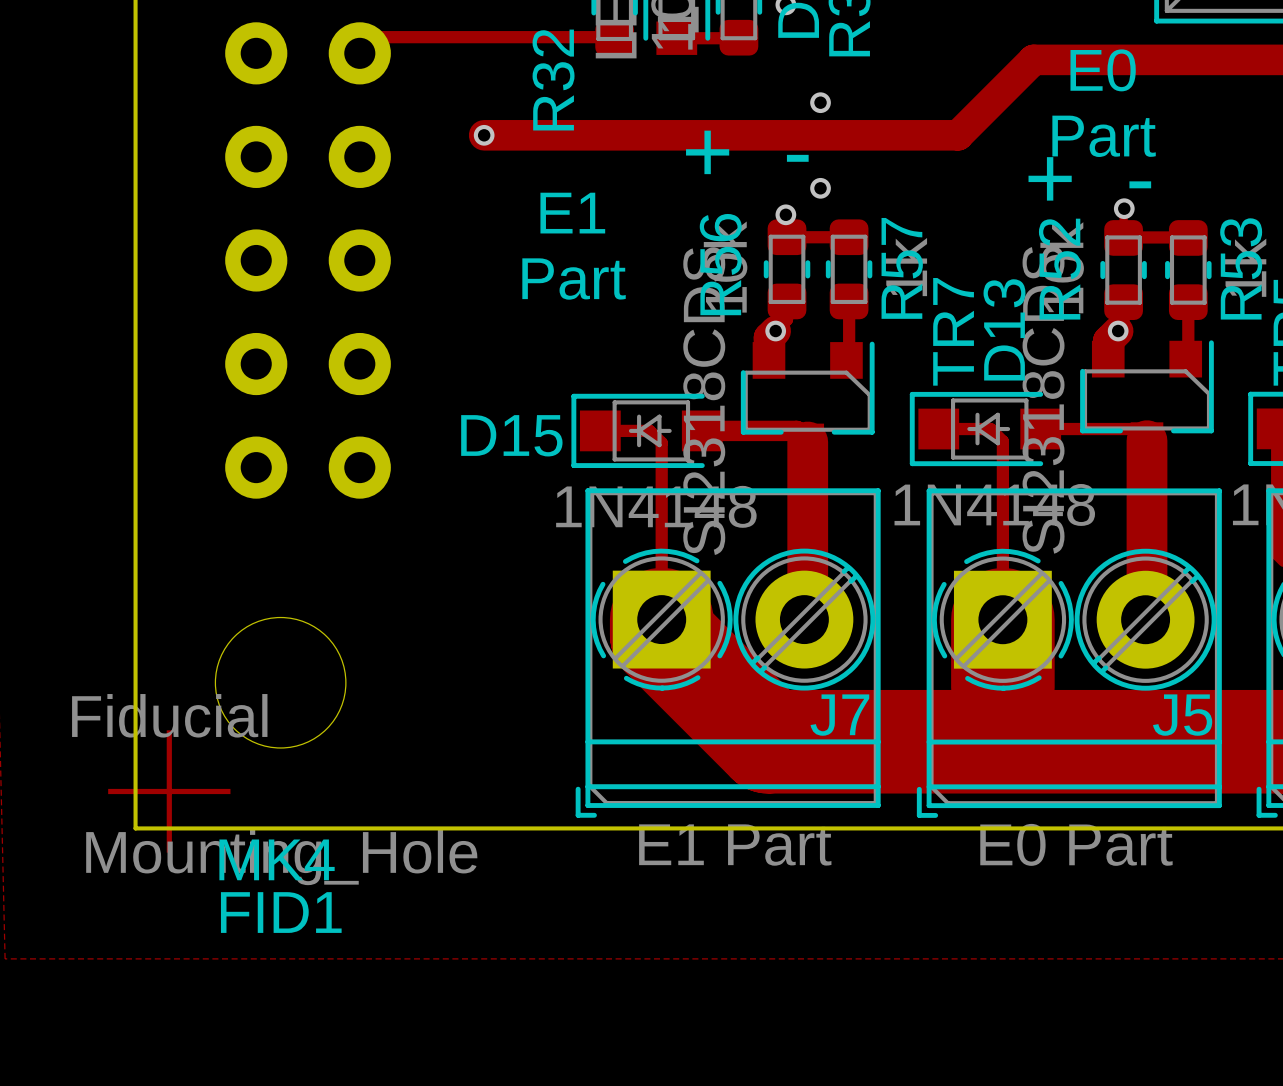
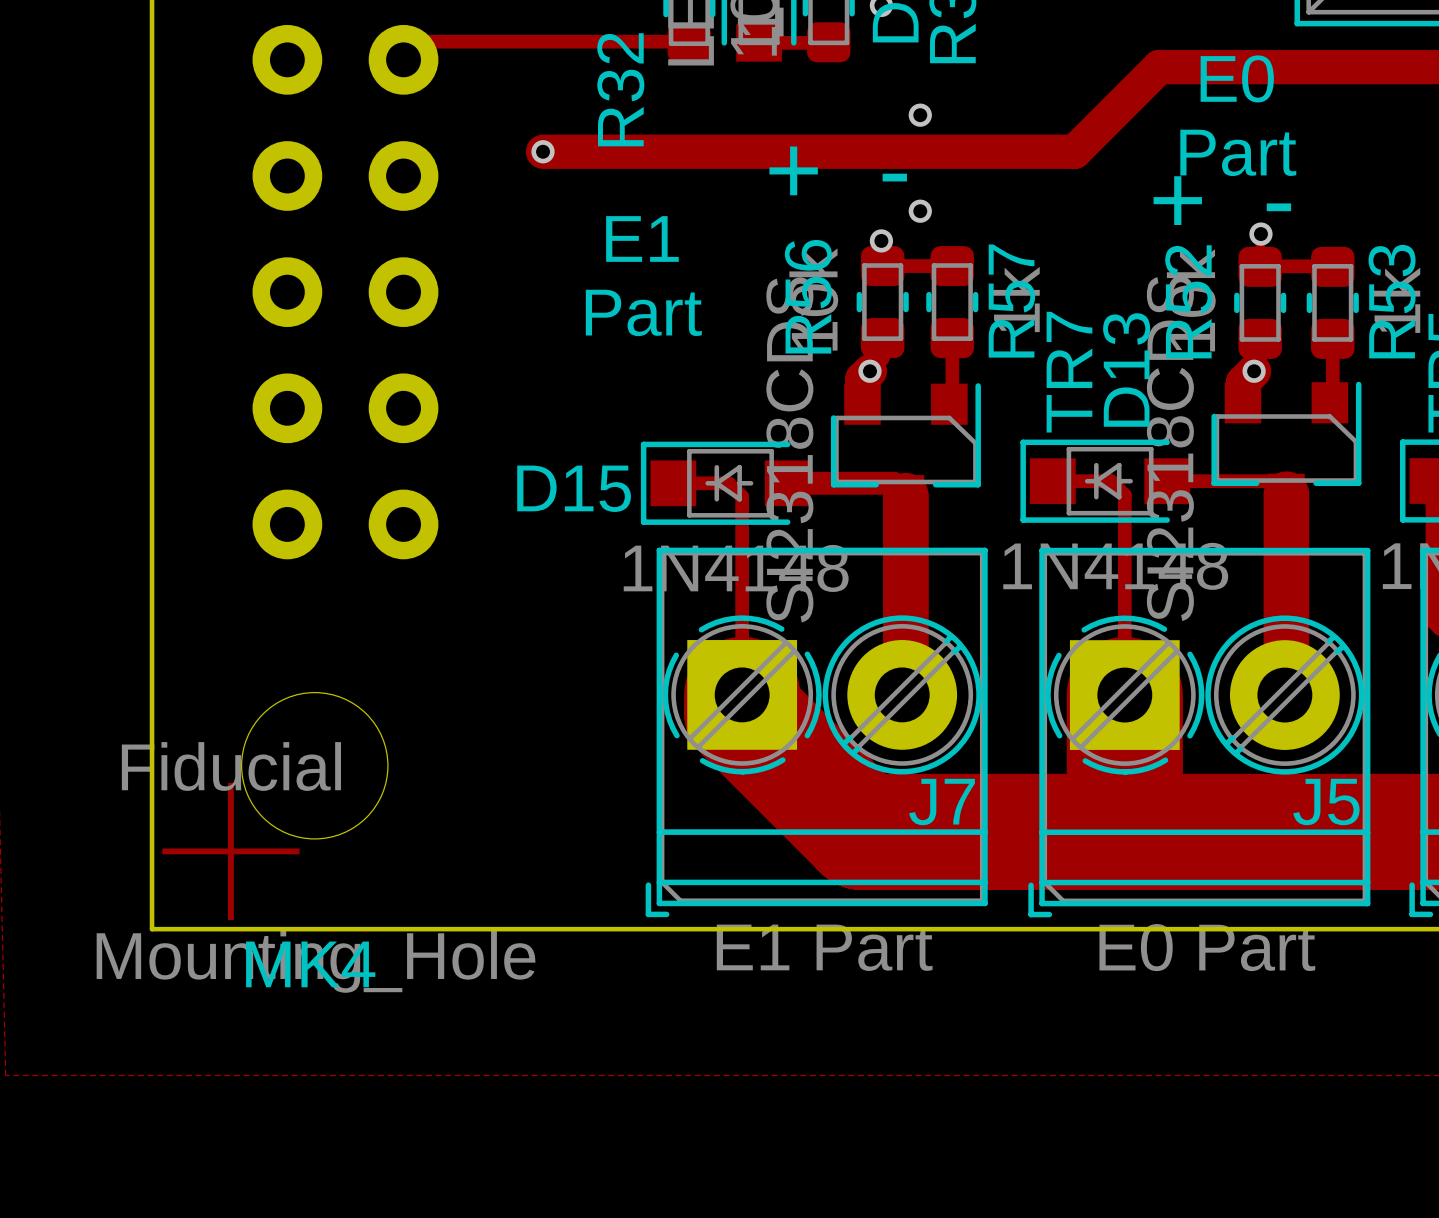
part: none -> Fiducial (230, 851)
FID1: Fiducial (169, 791) -> none

